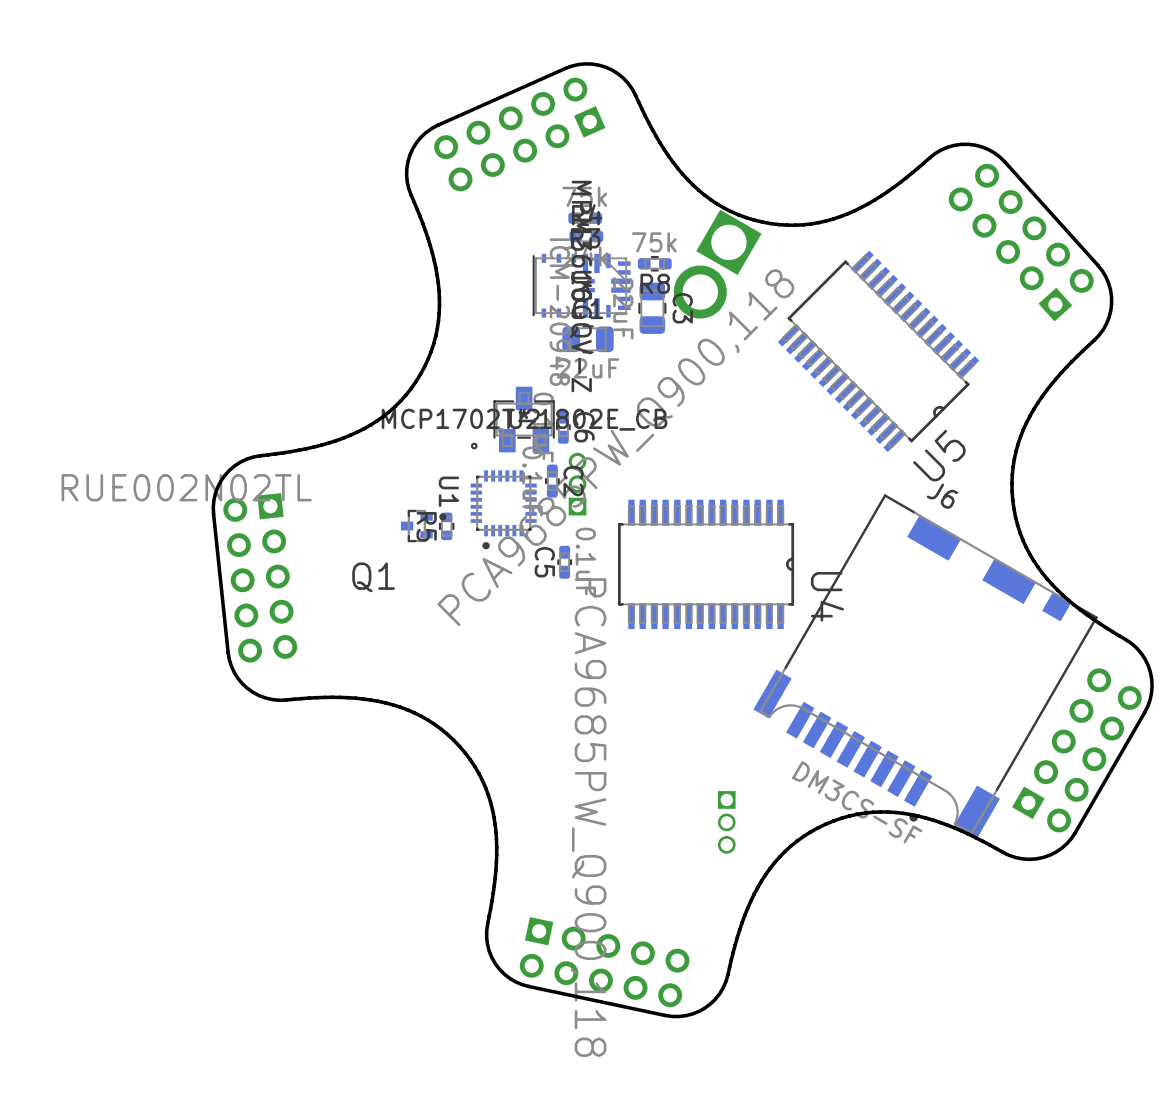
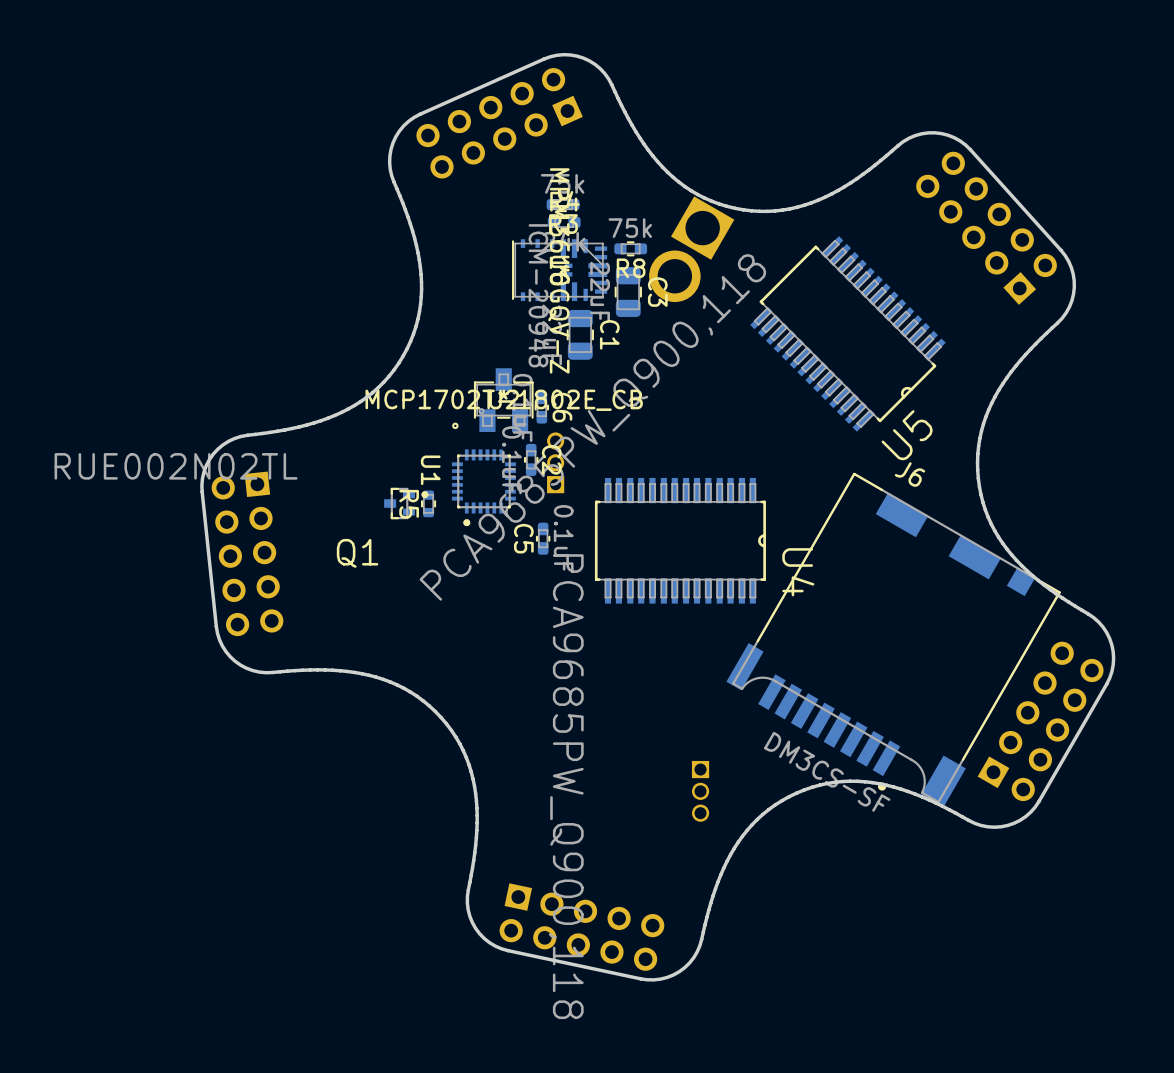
C1 rotation: 0° (588, 339) -> 90° clockwise (580, 334)

